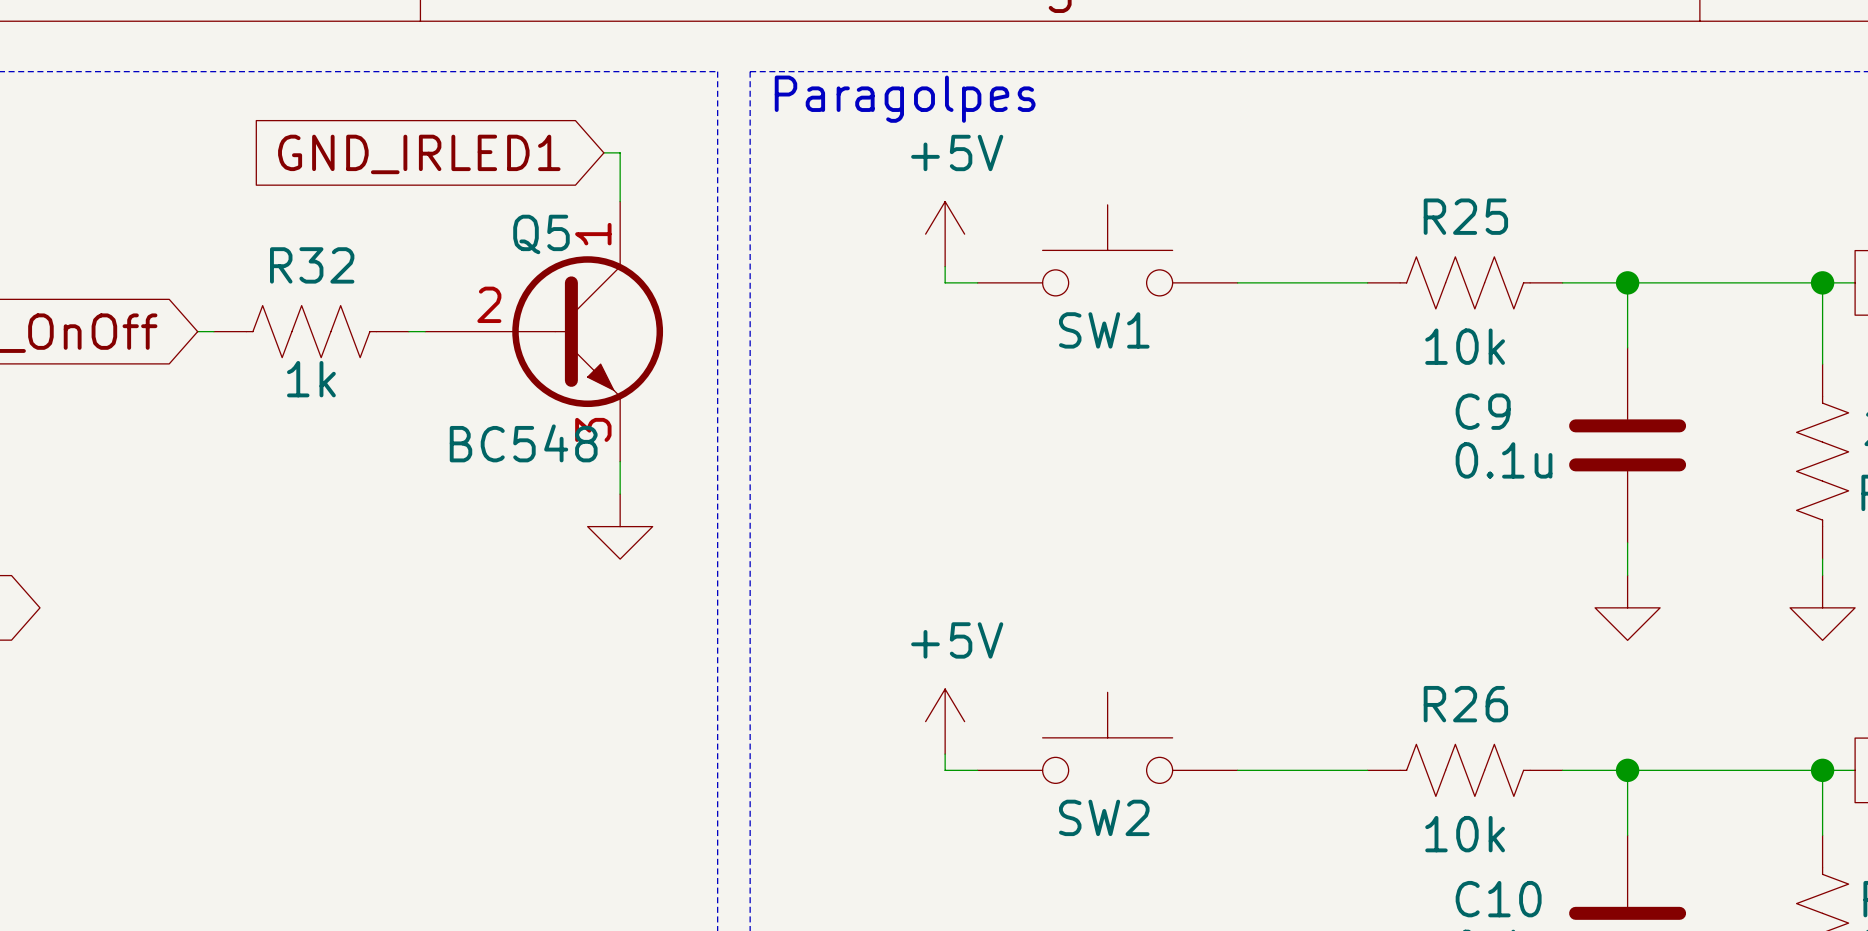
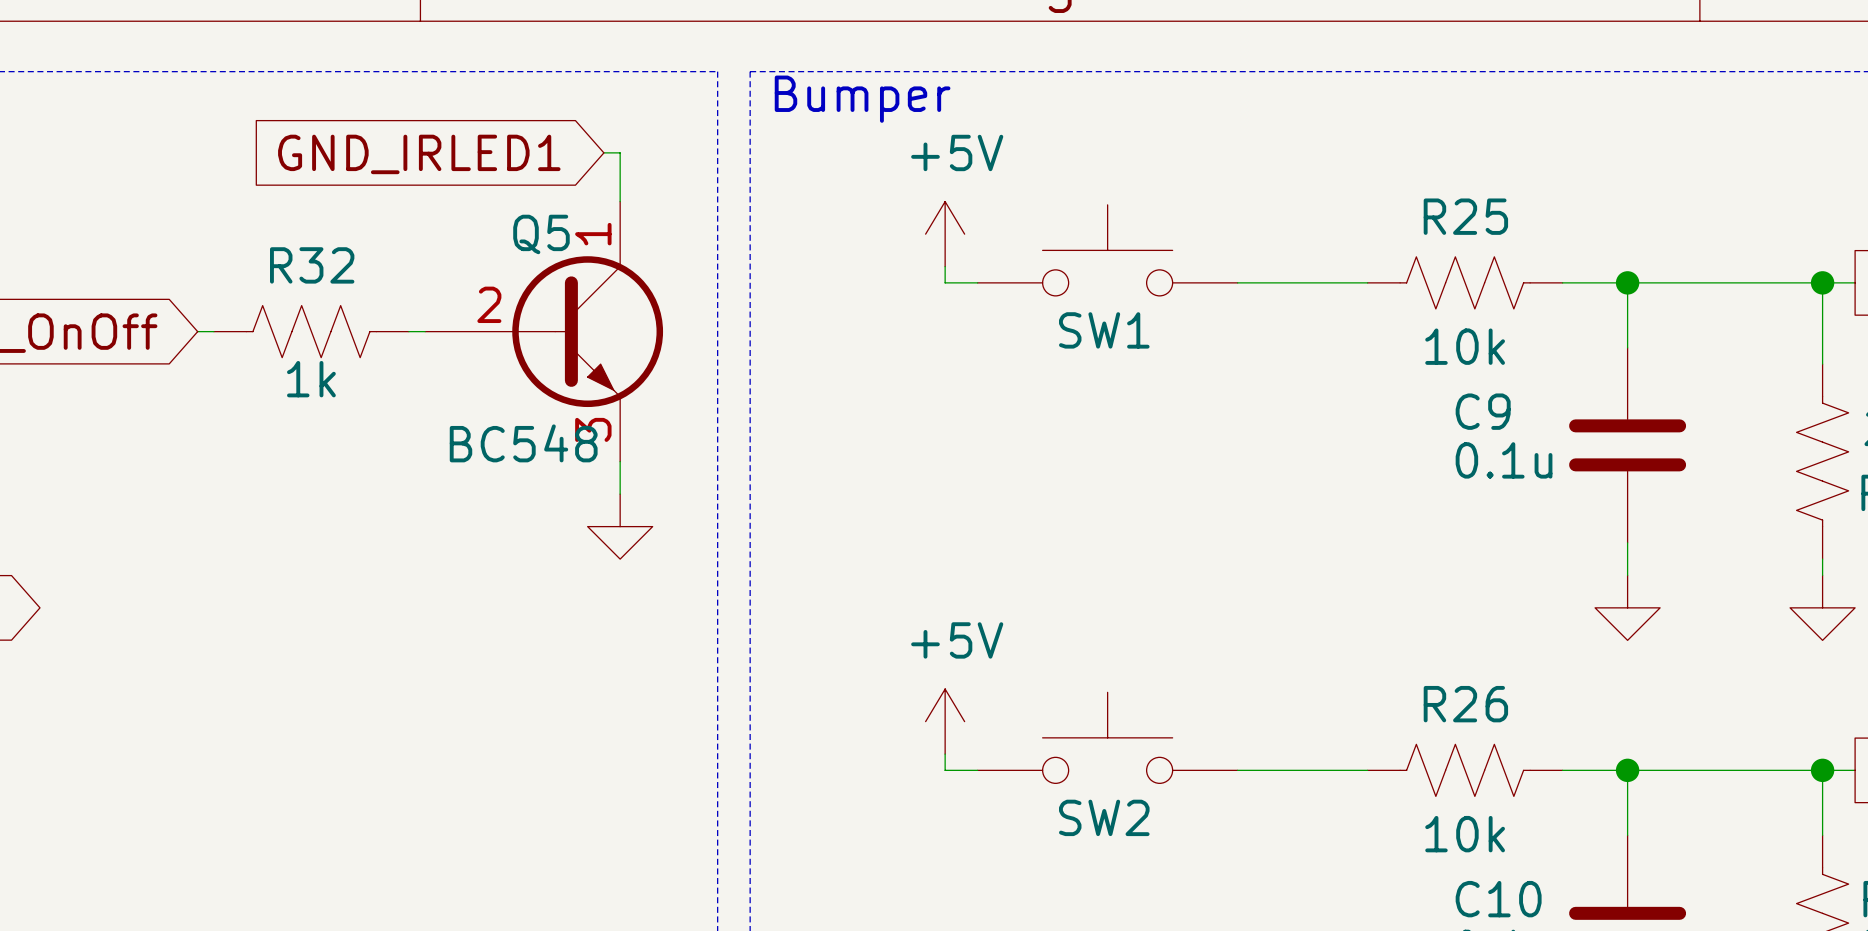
text: Paragolpes (905, 99) -> Bumper (862, 99)

